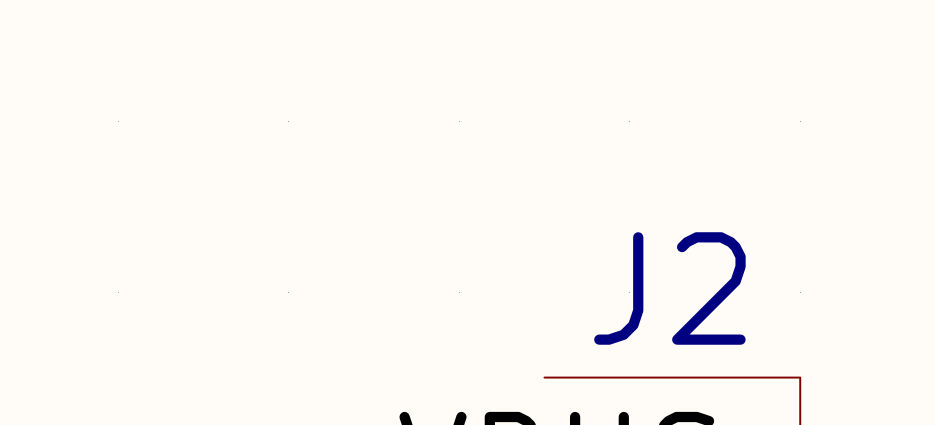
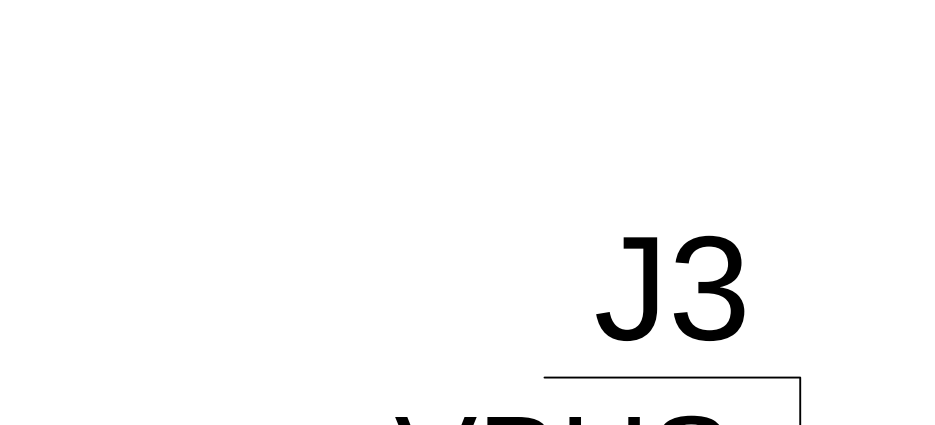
J2 name: J2 (669, 288) -> J3 (670, 288)

